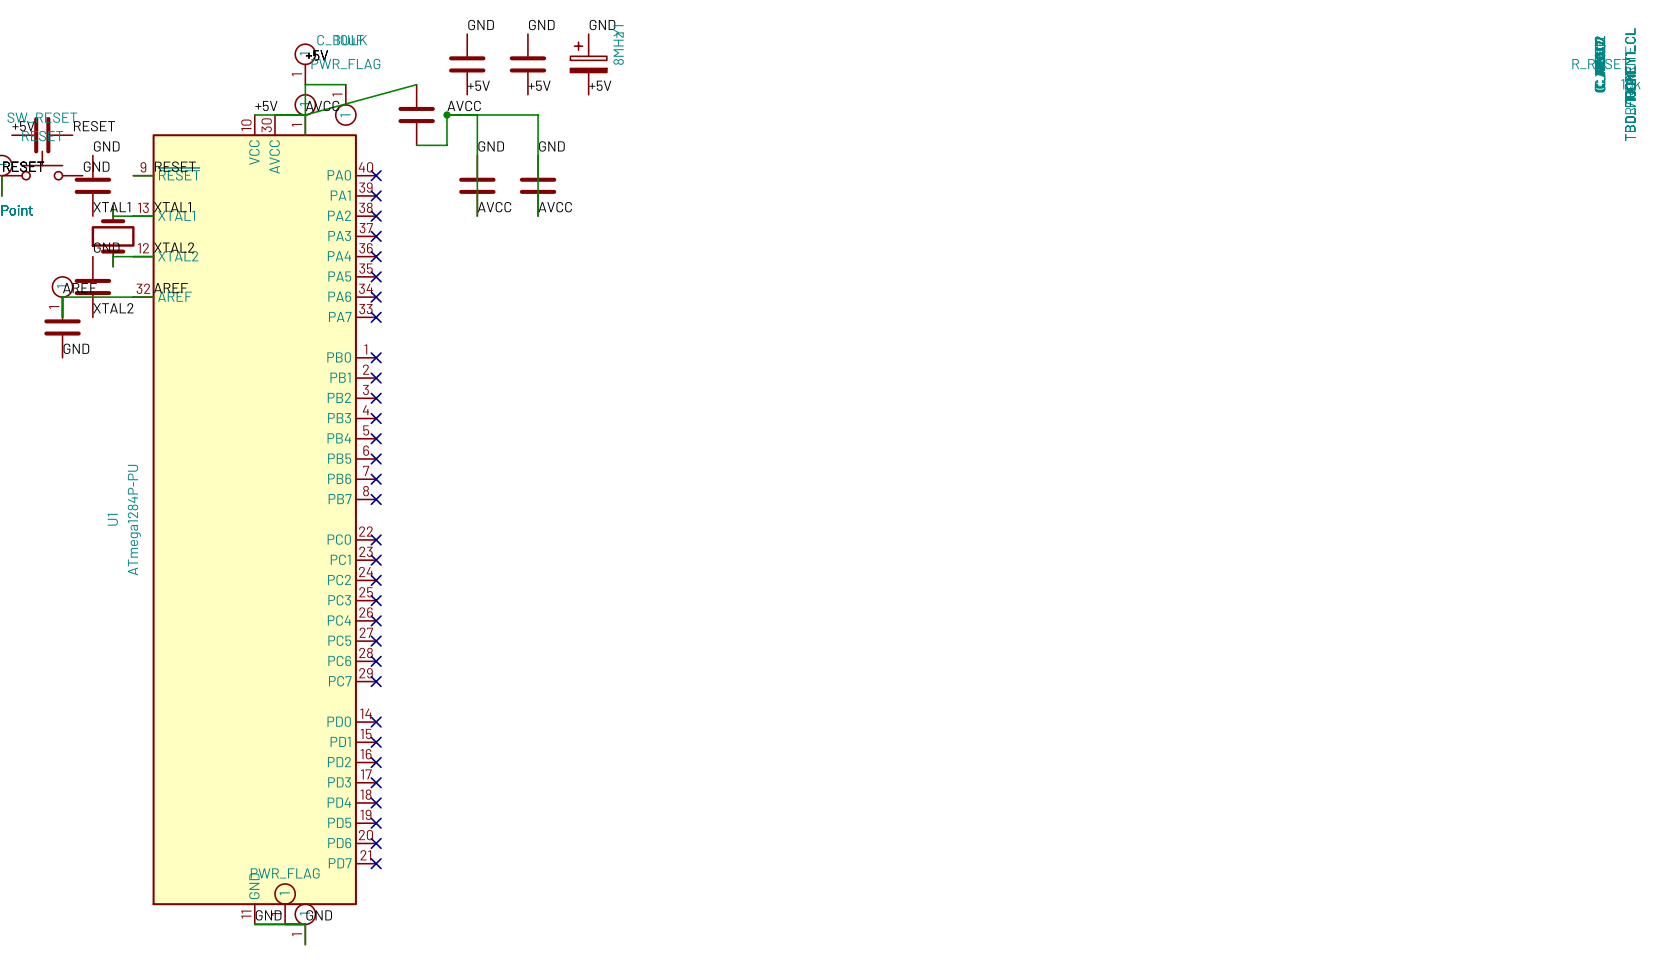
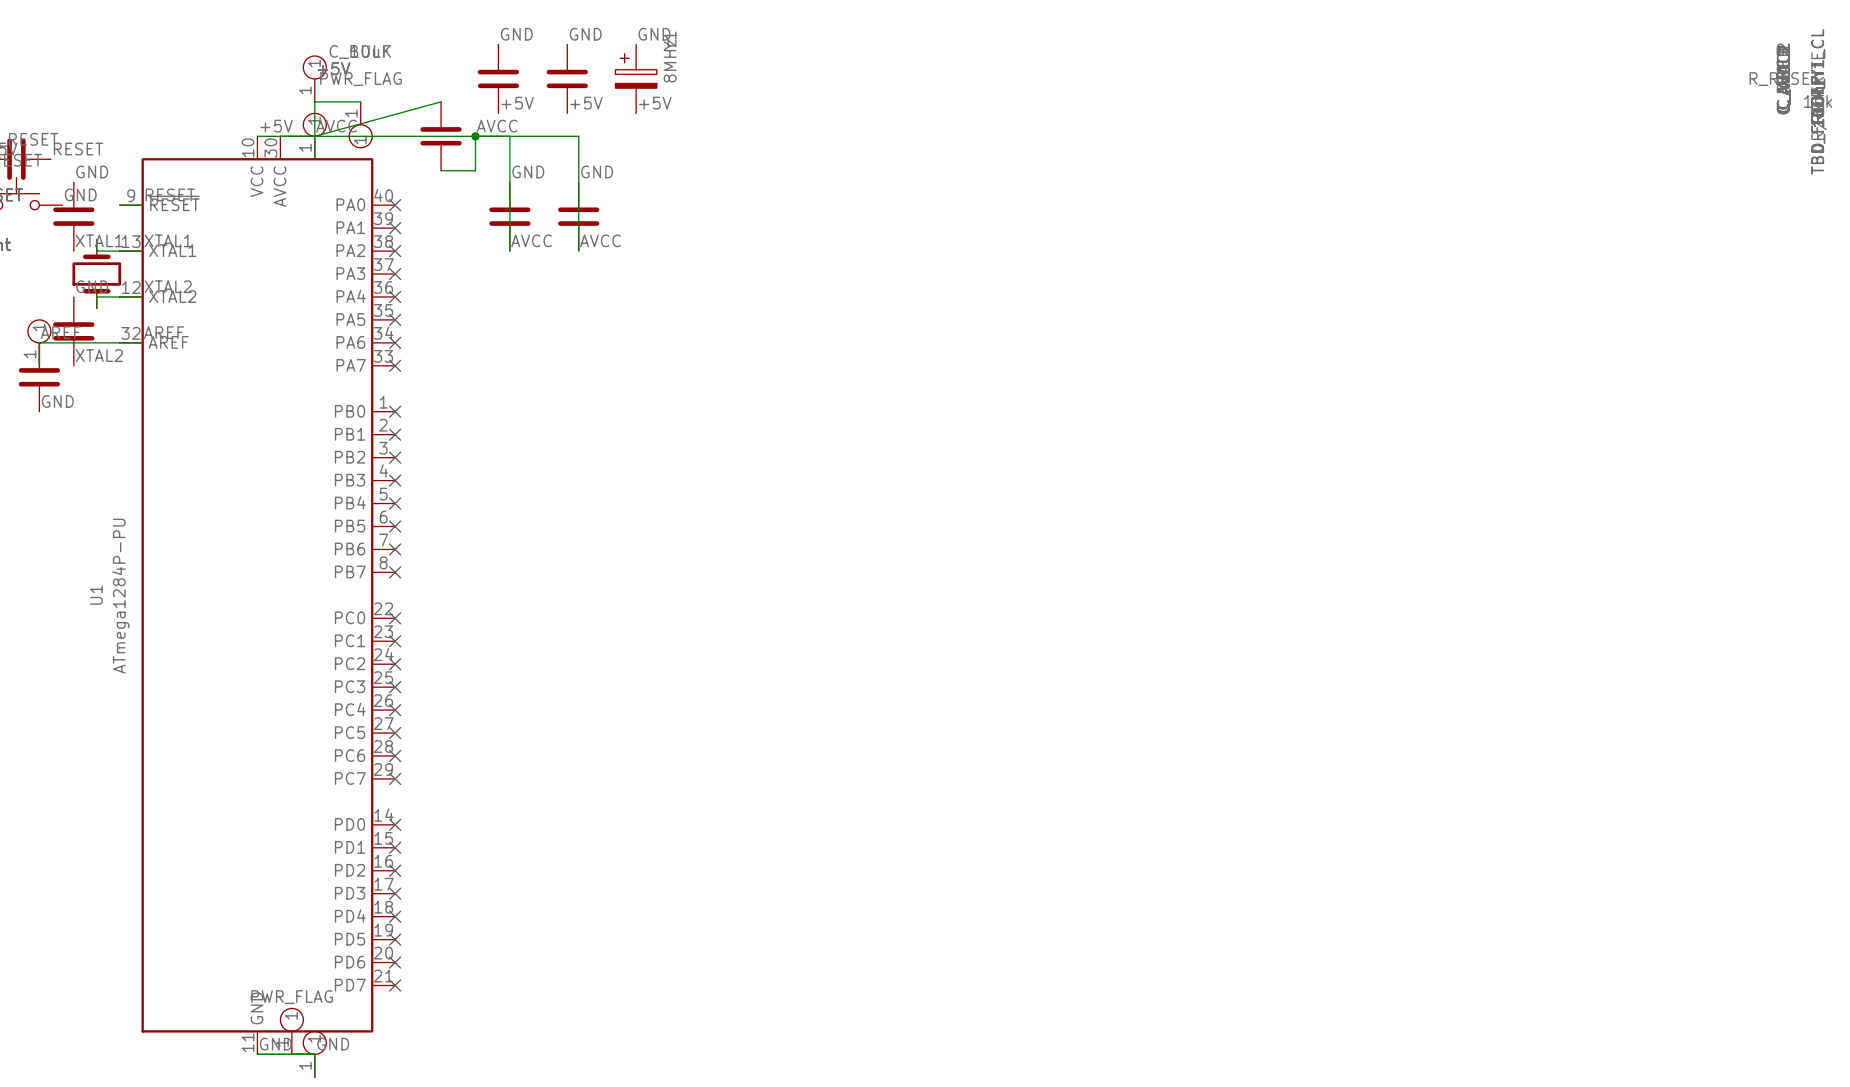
wire: none -> (314, 136) (475, 136)

